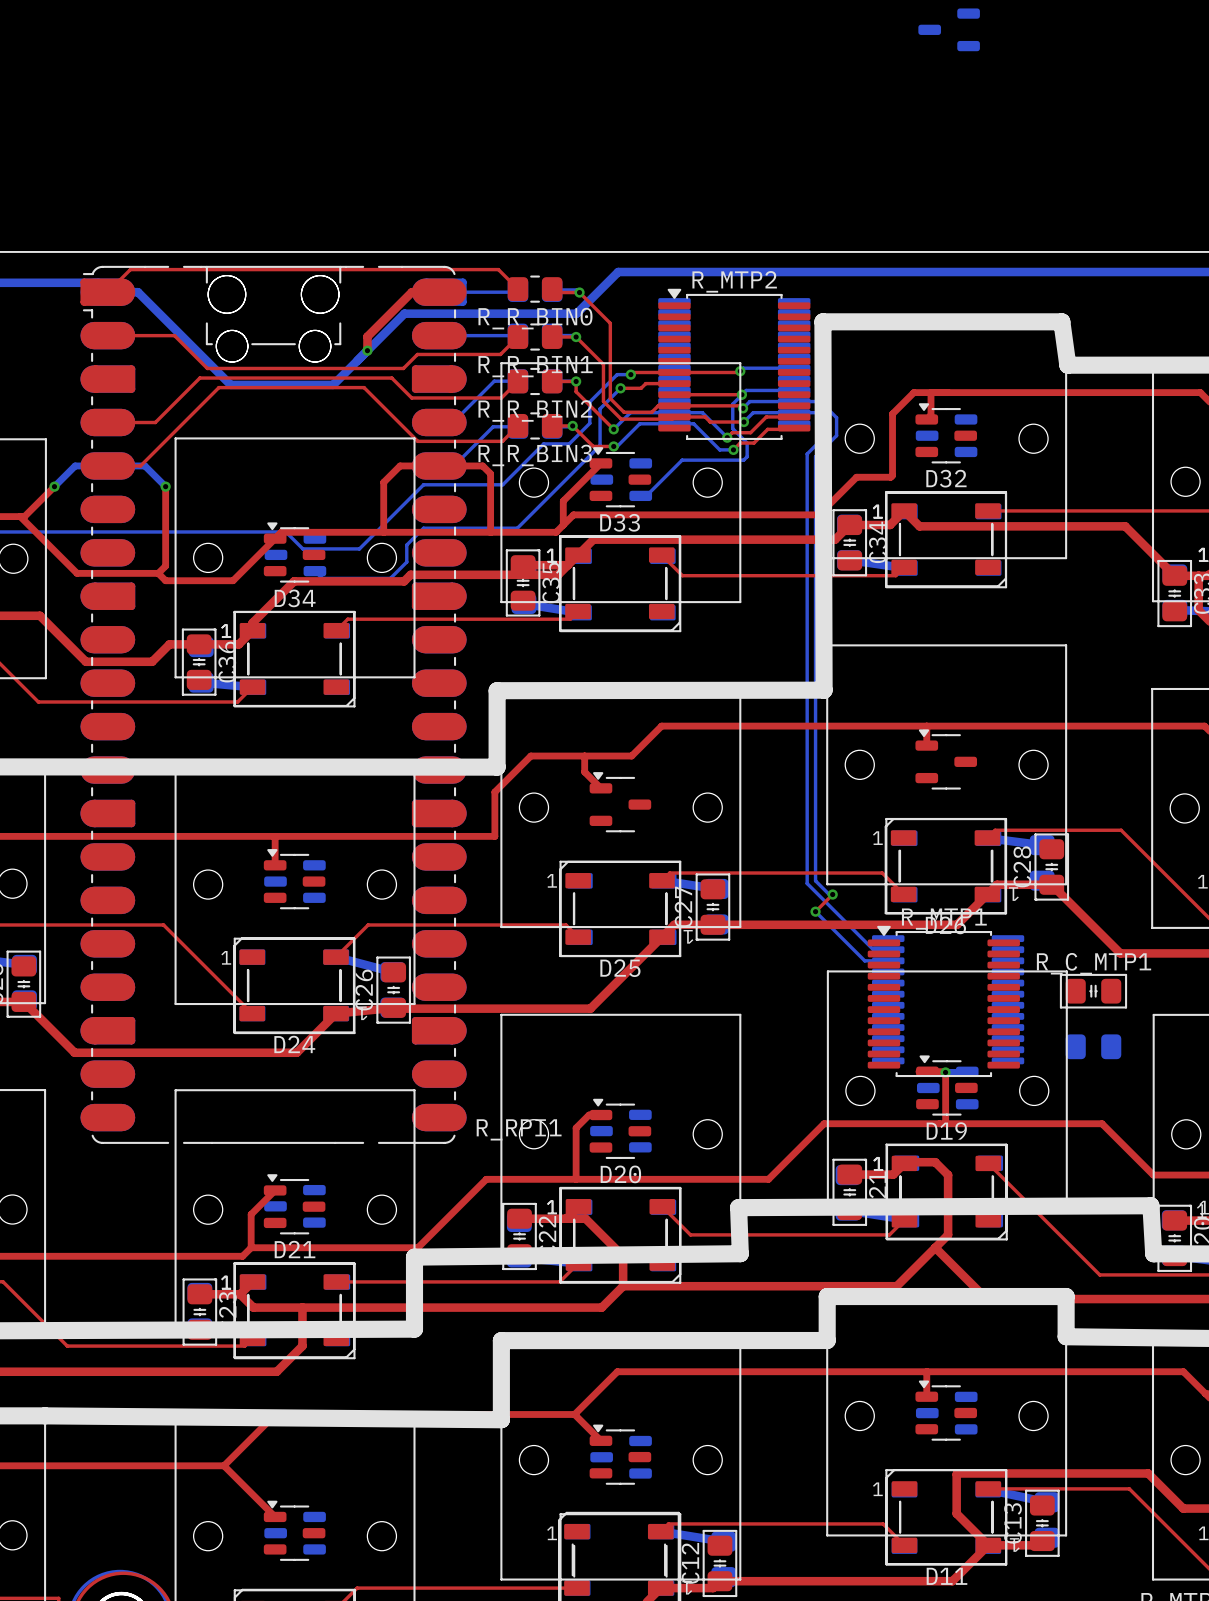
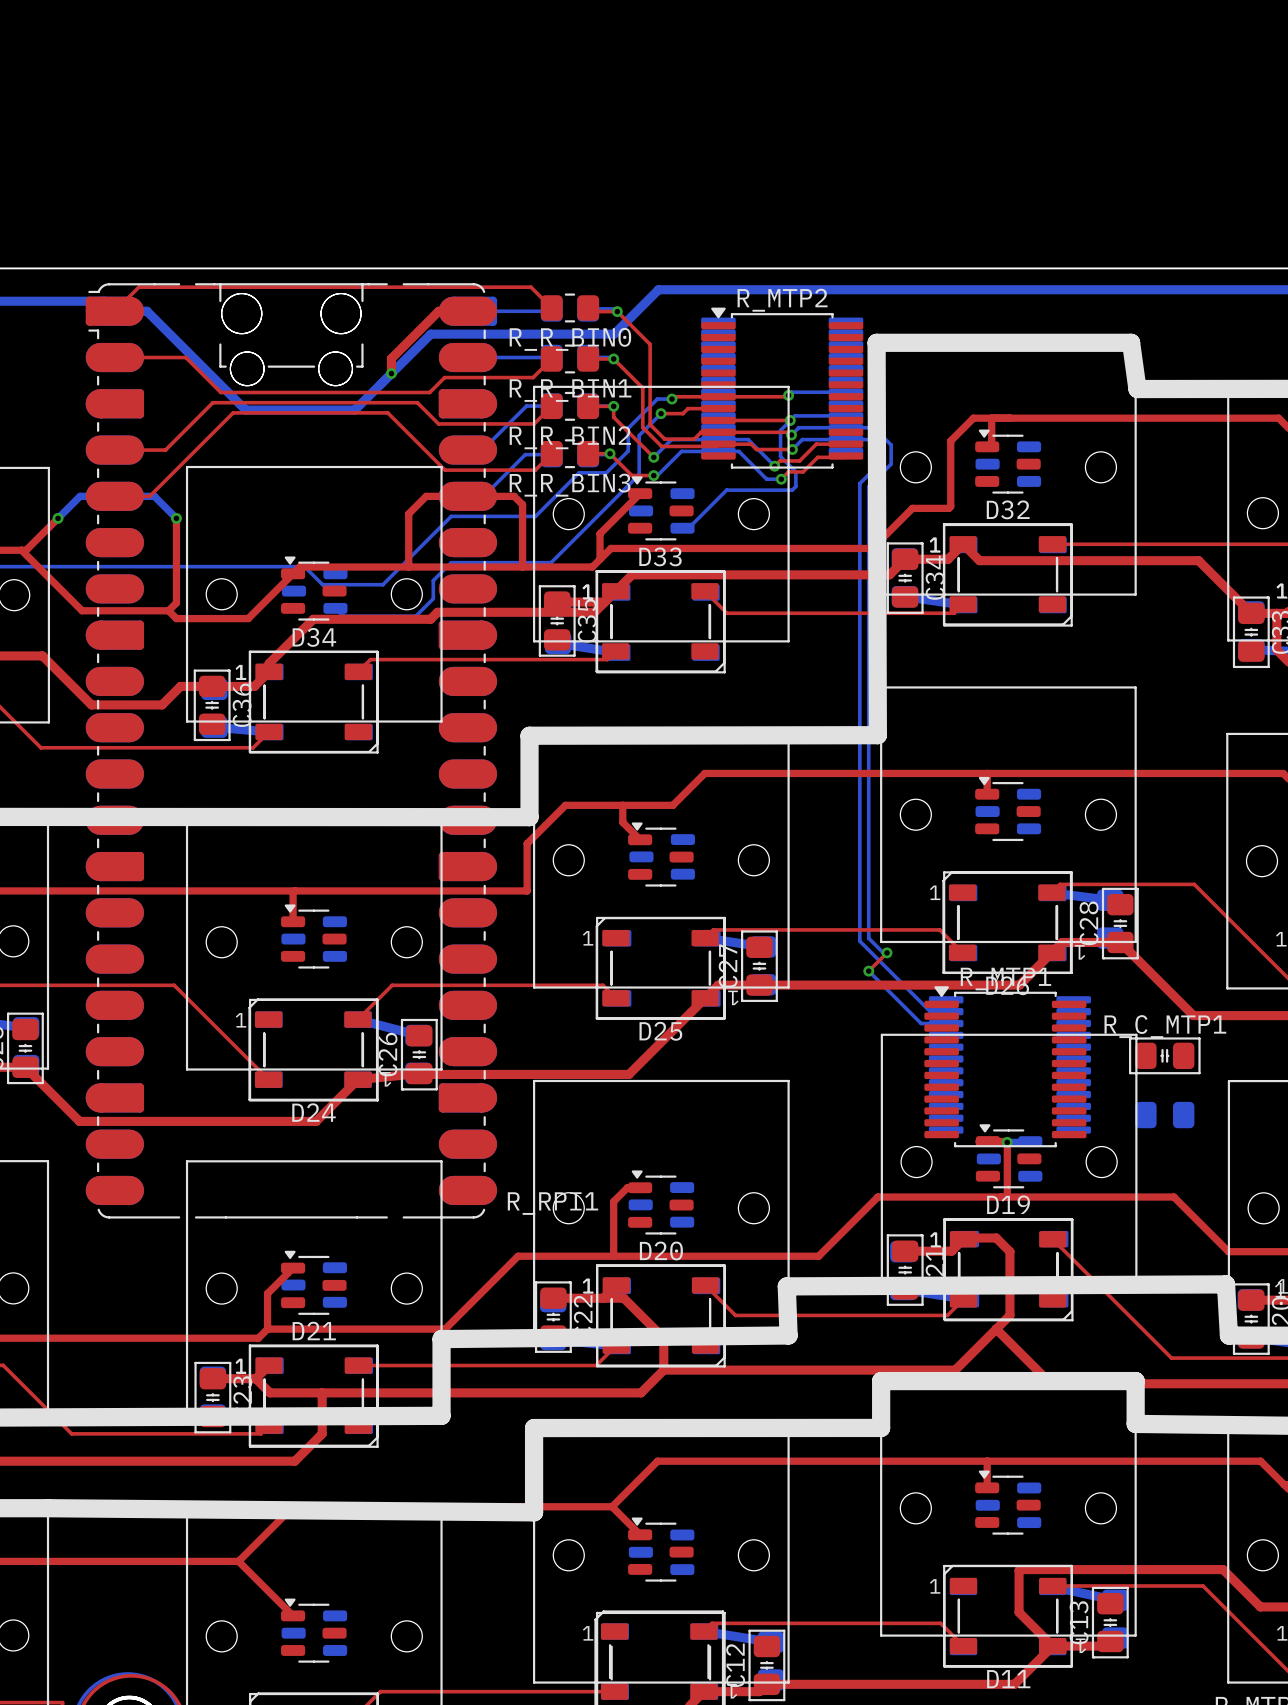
part: (949, 29) -> none
part: none -> (1008, 811)
part: none -> (662, 856)

